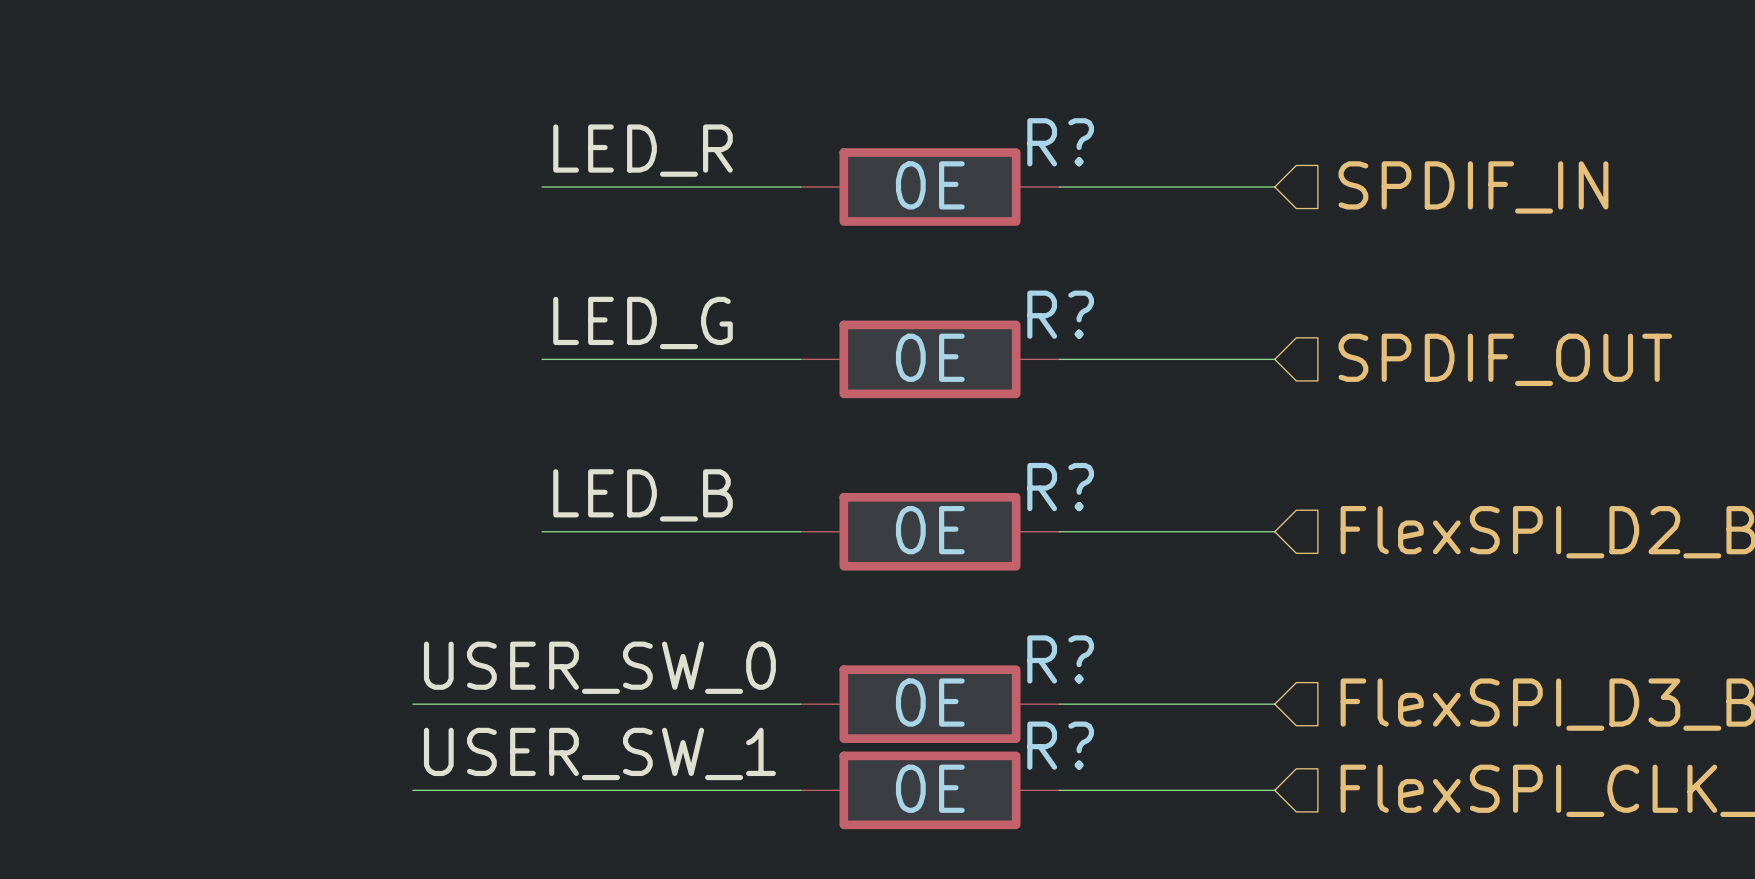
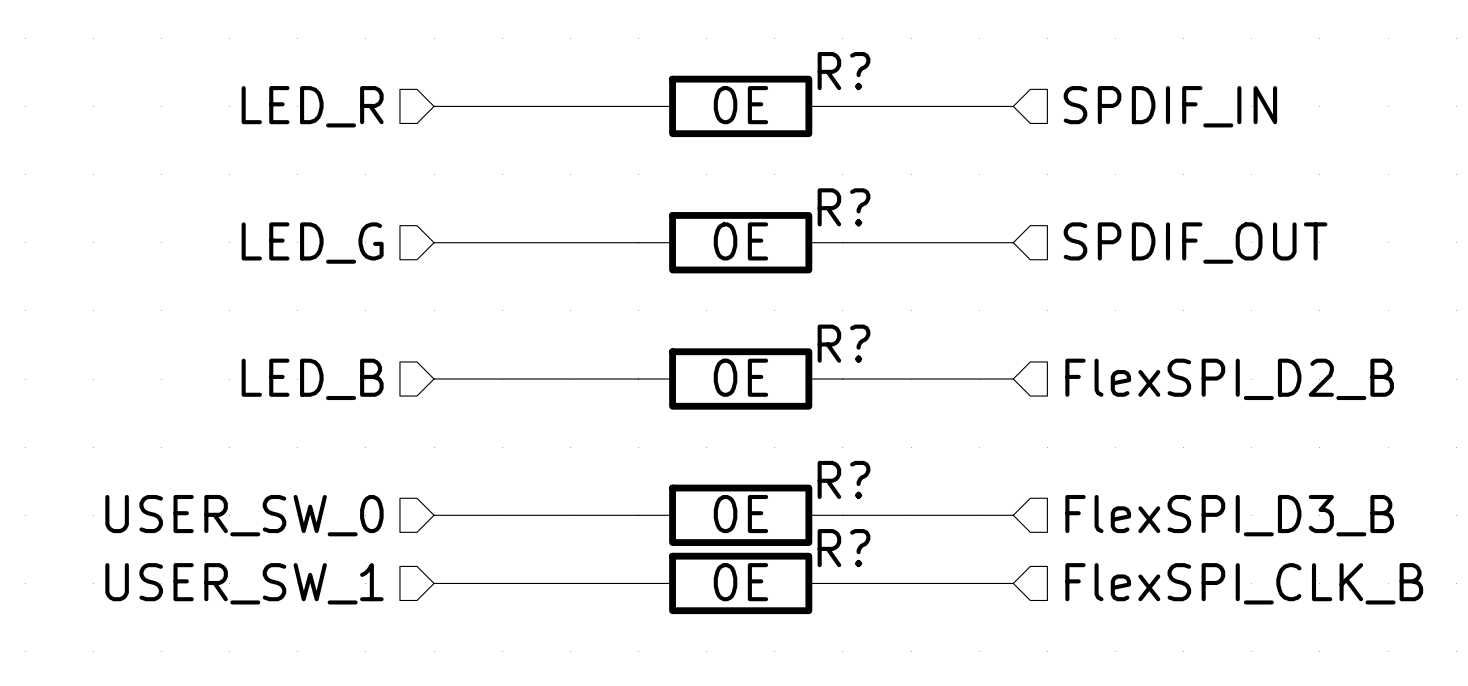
label: LED_R (643, 150) -> none
hierarchical label: none -> LED_R (312, 106)
label: LED_G (643, 322) -> none
hierarchical label: none -> LED_G (312, 243)
label: LED_B (643, 495) -> none
hierarchical label: none -> LED_B (312, 379)
label: USER_SW_0 (599, 667) -> none
hierarchical label: none -> USER_SW_0 (244, 515)
wire: (412, 704) (542, 704) -> none
label: USER_SW_1 (599, 753) -> none
hierarchical label: none -> USER_SW_1 (244, 583)
wire: (412, 790) (542, 790) -> none

